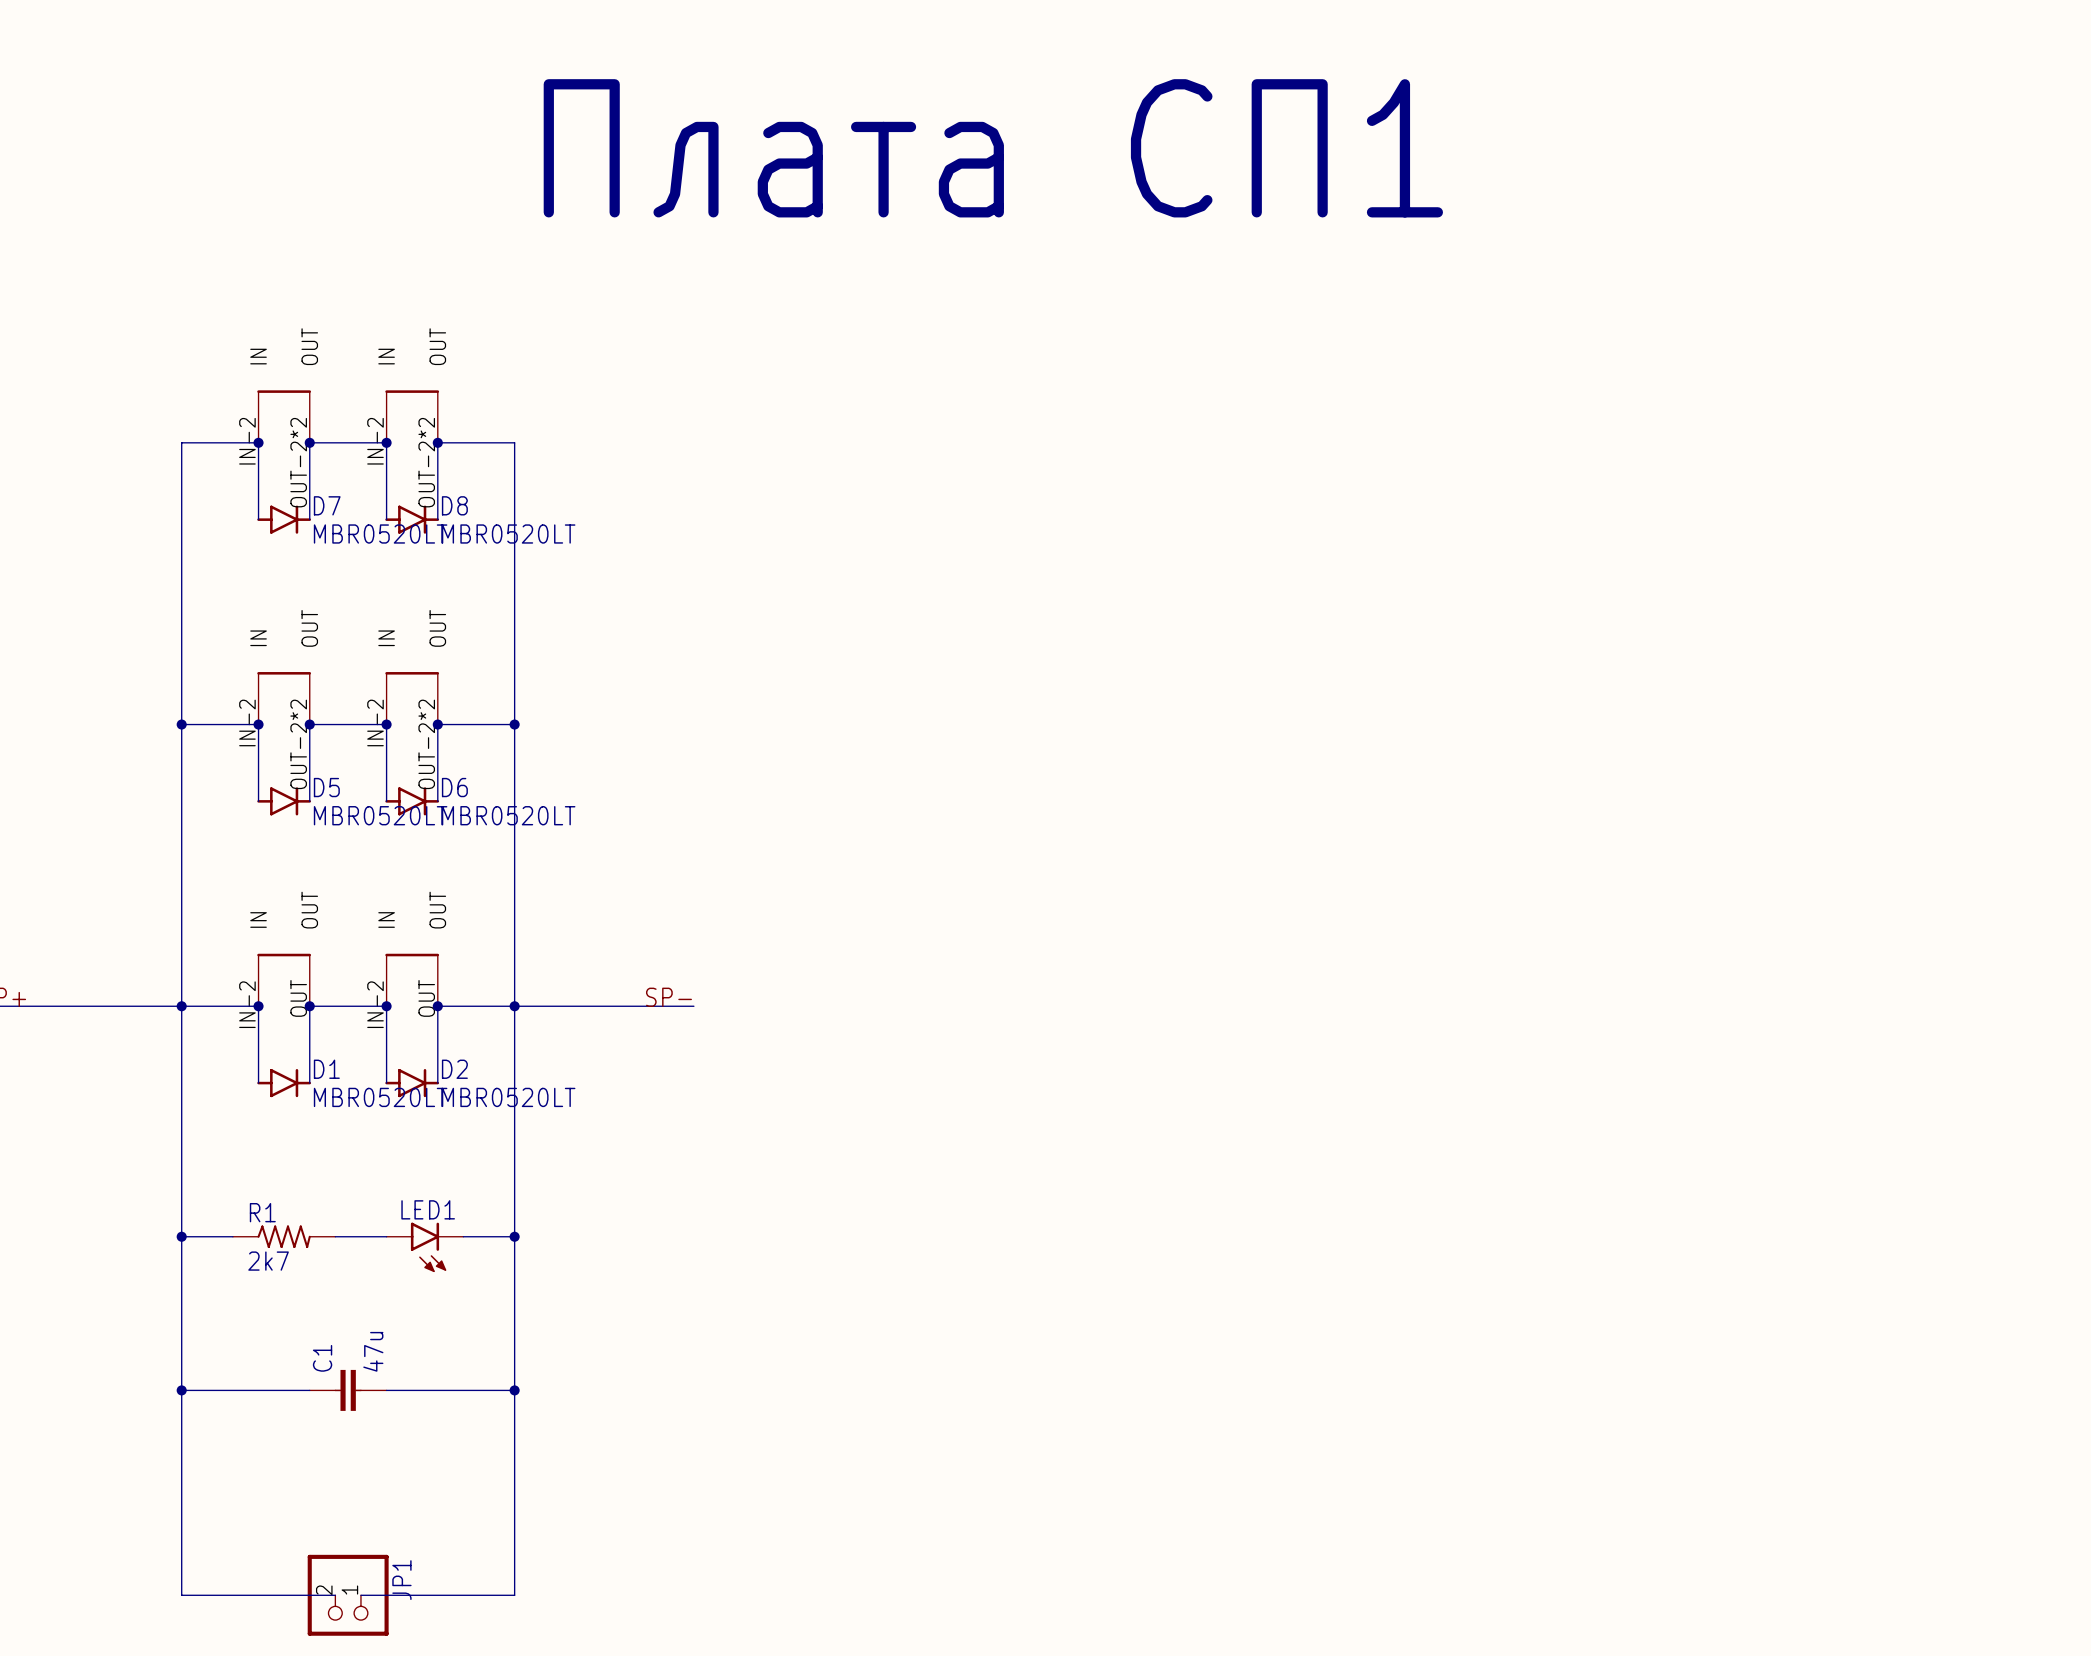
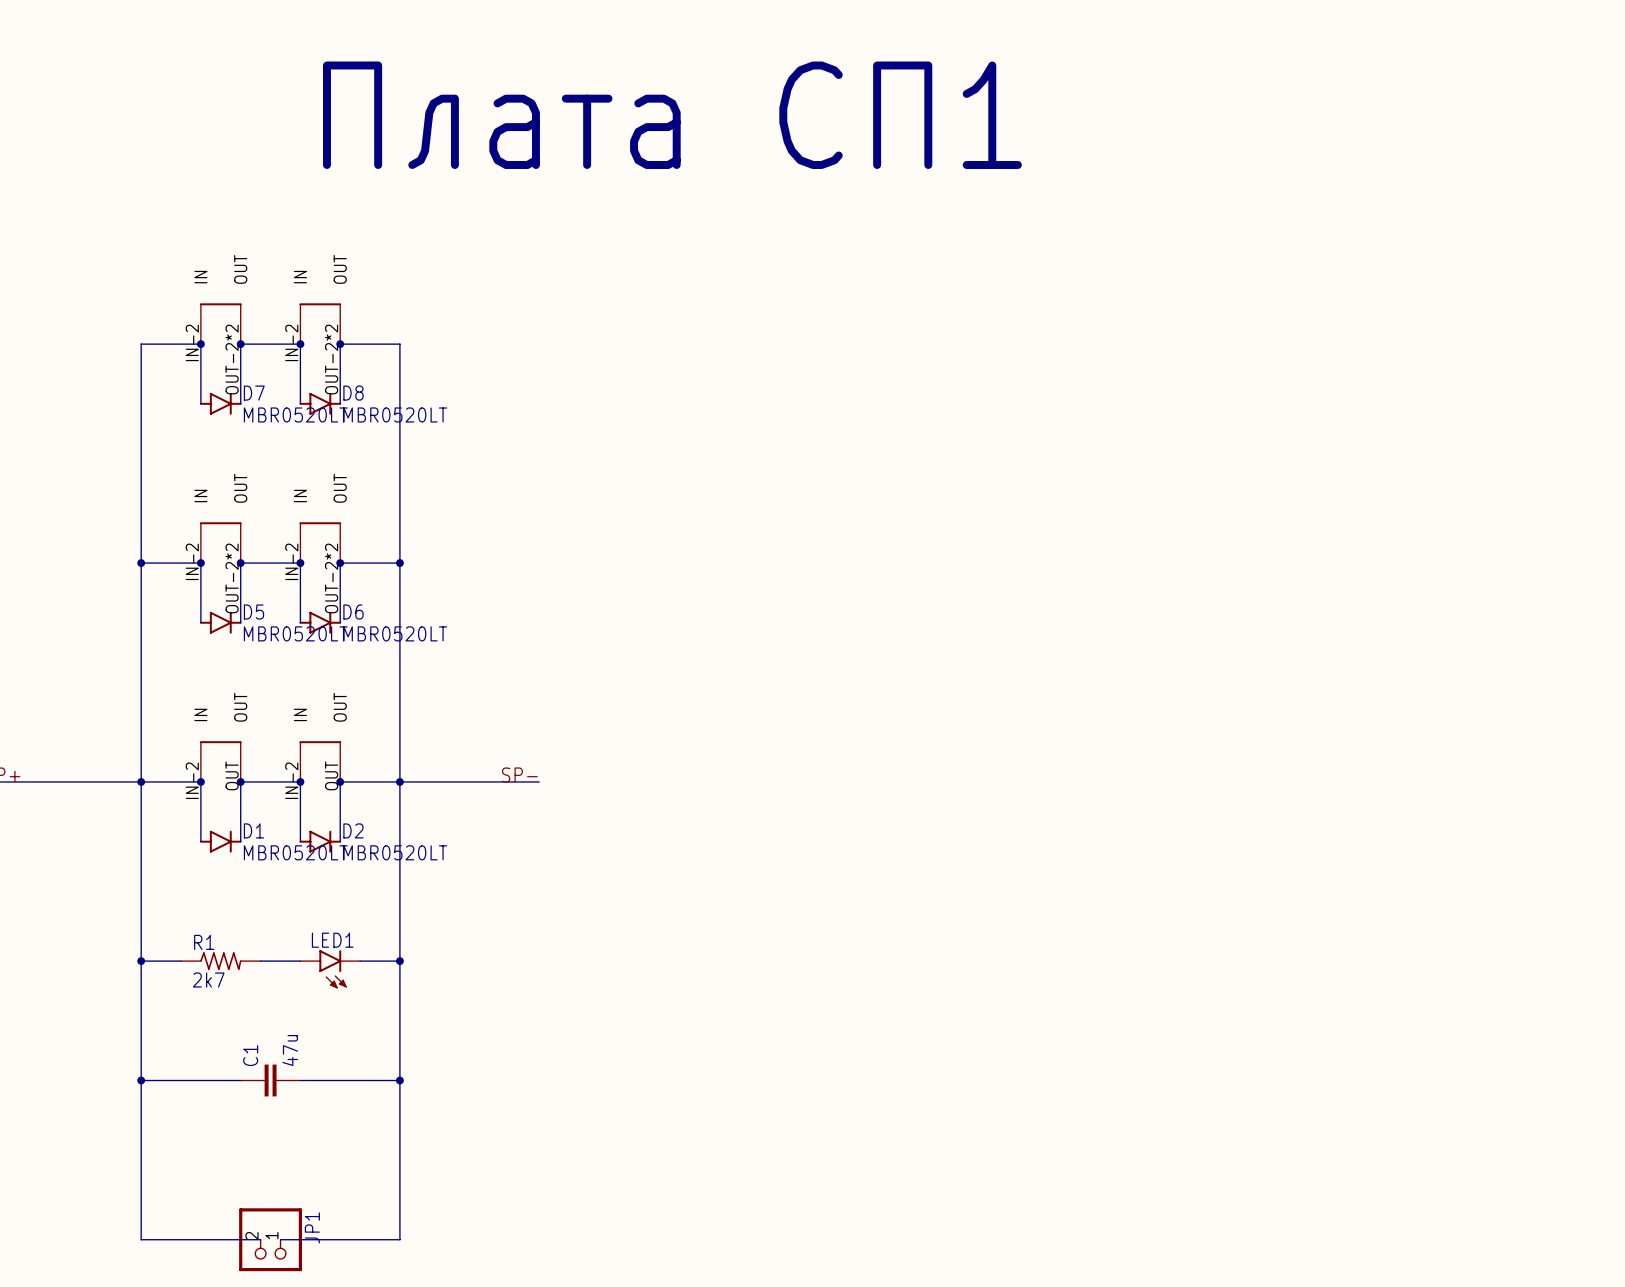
part position: (993, 148) -> (672, 115)

